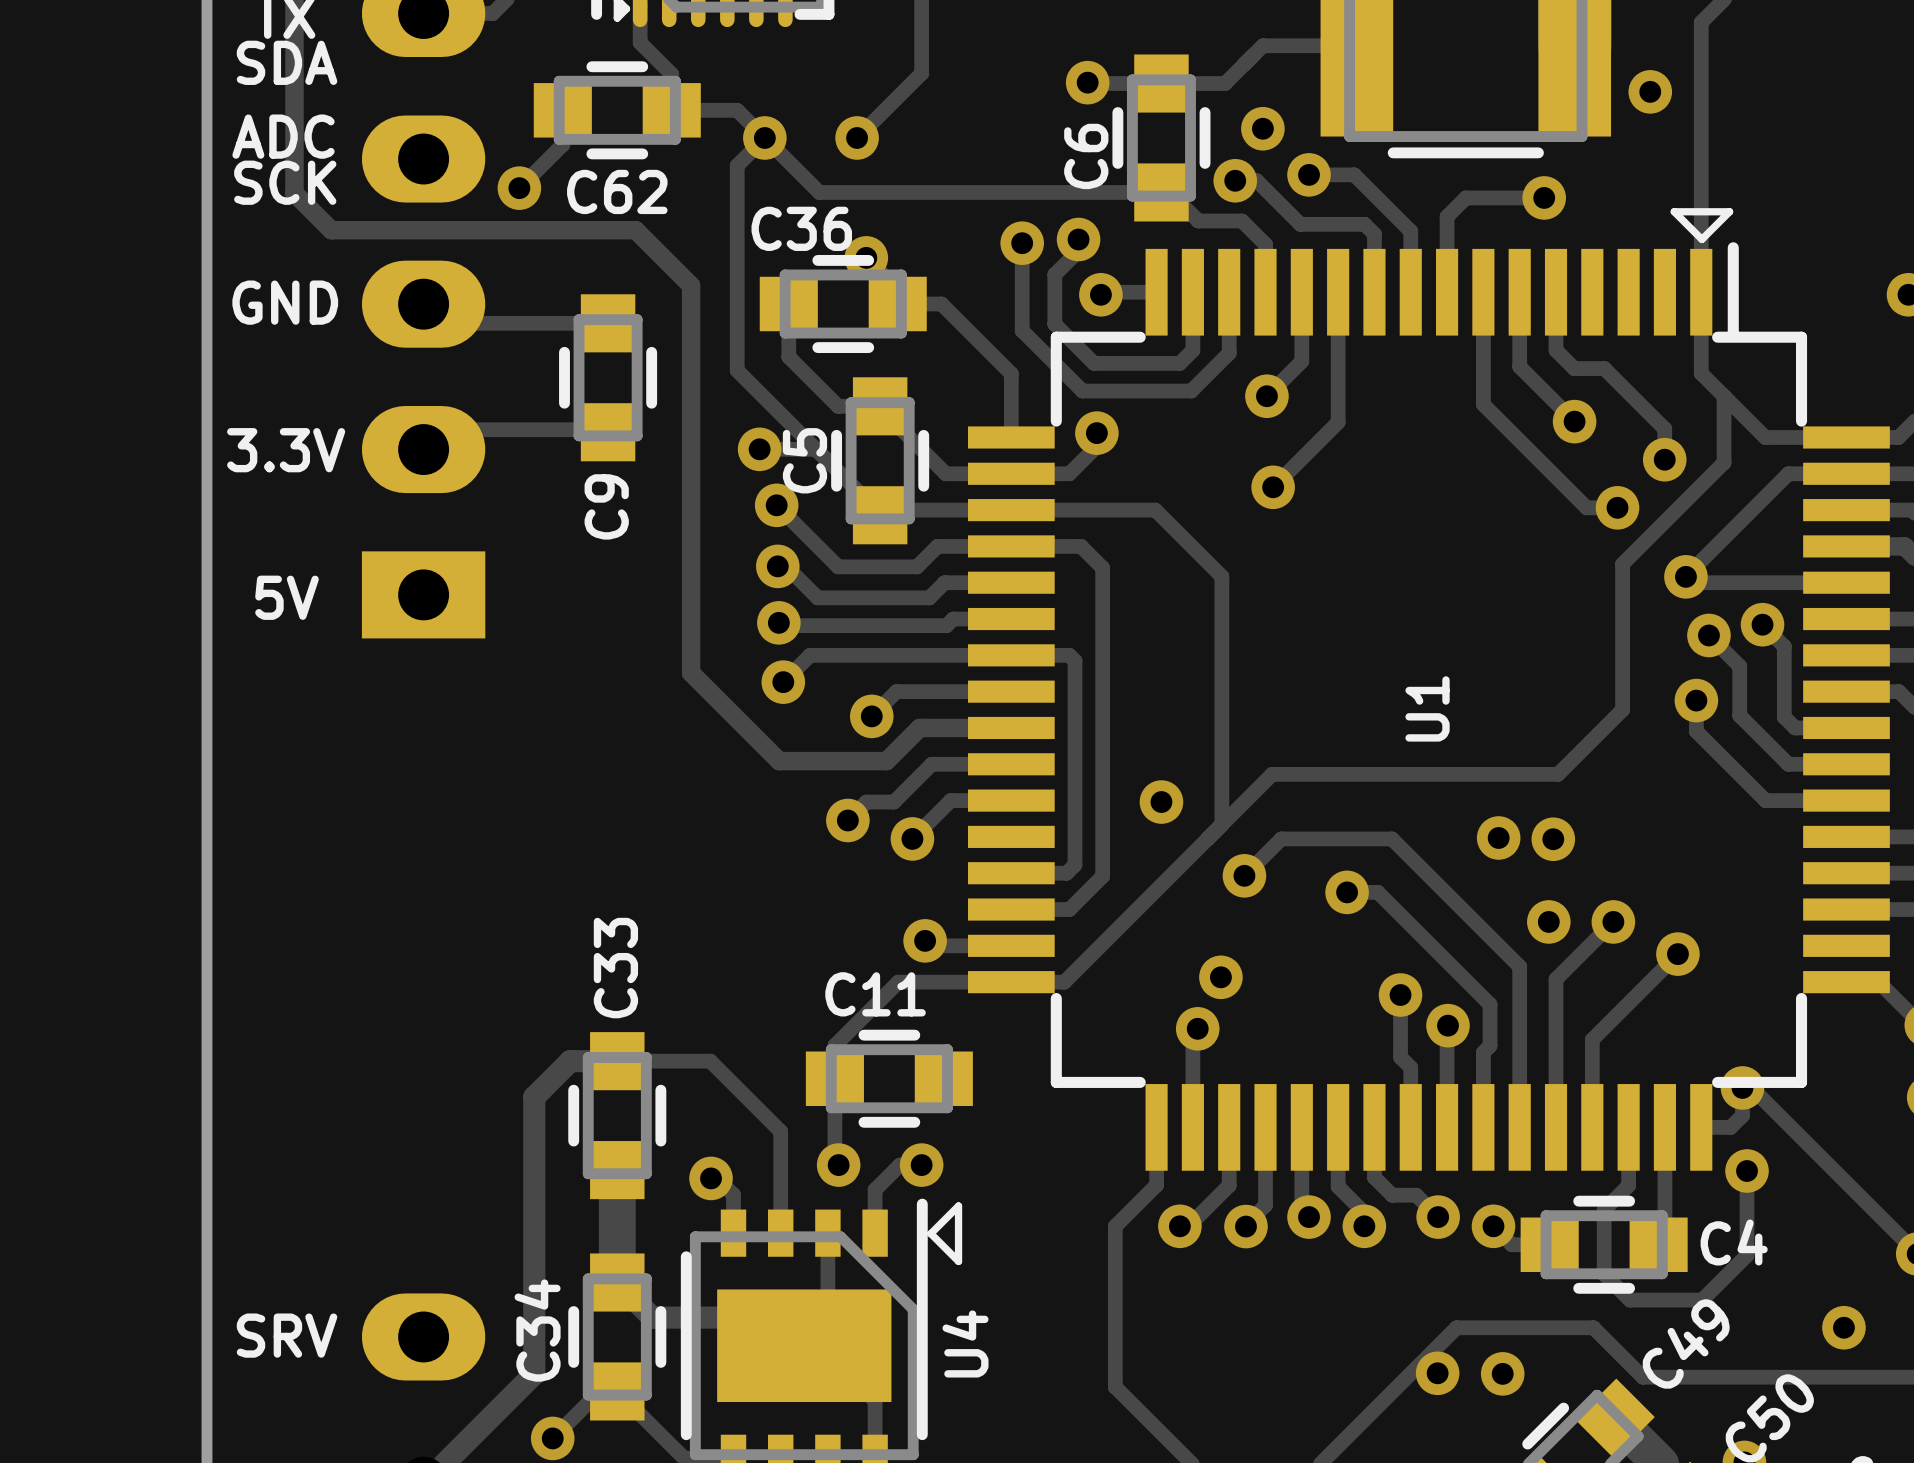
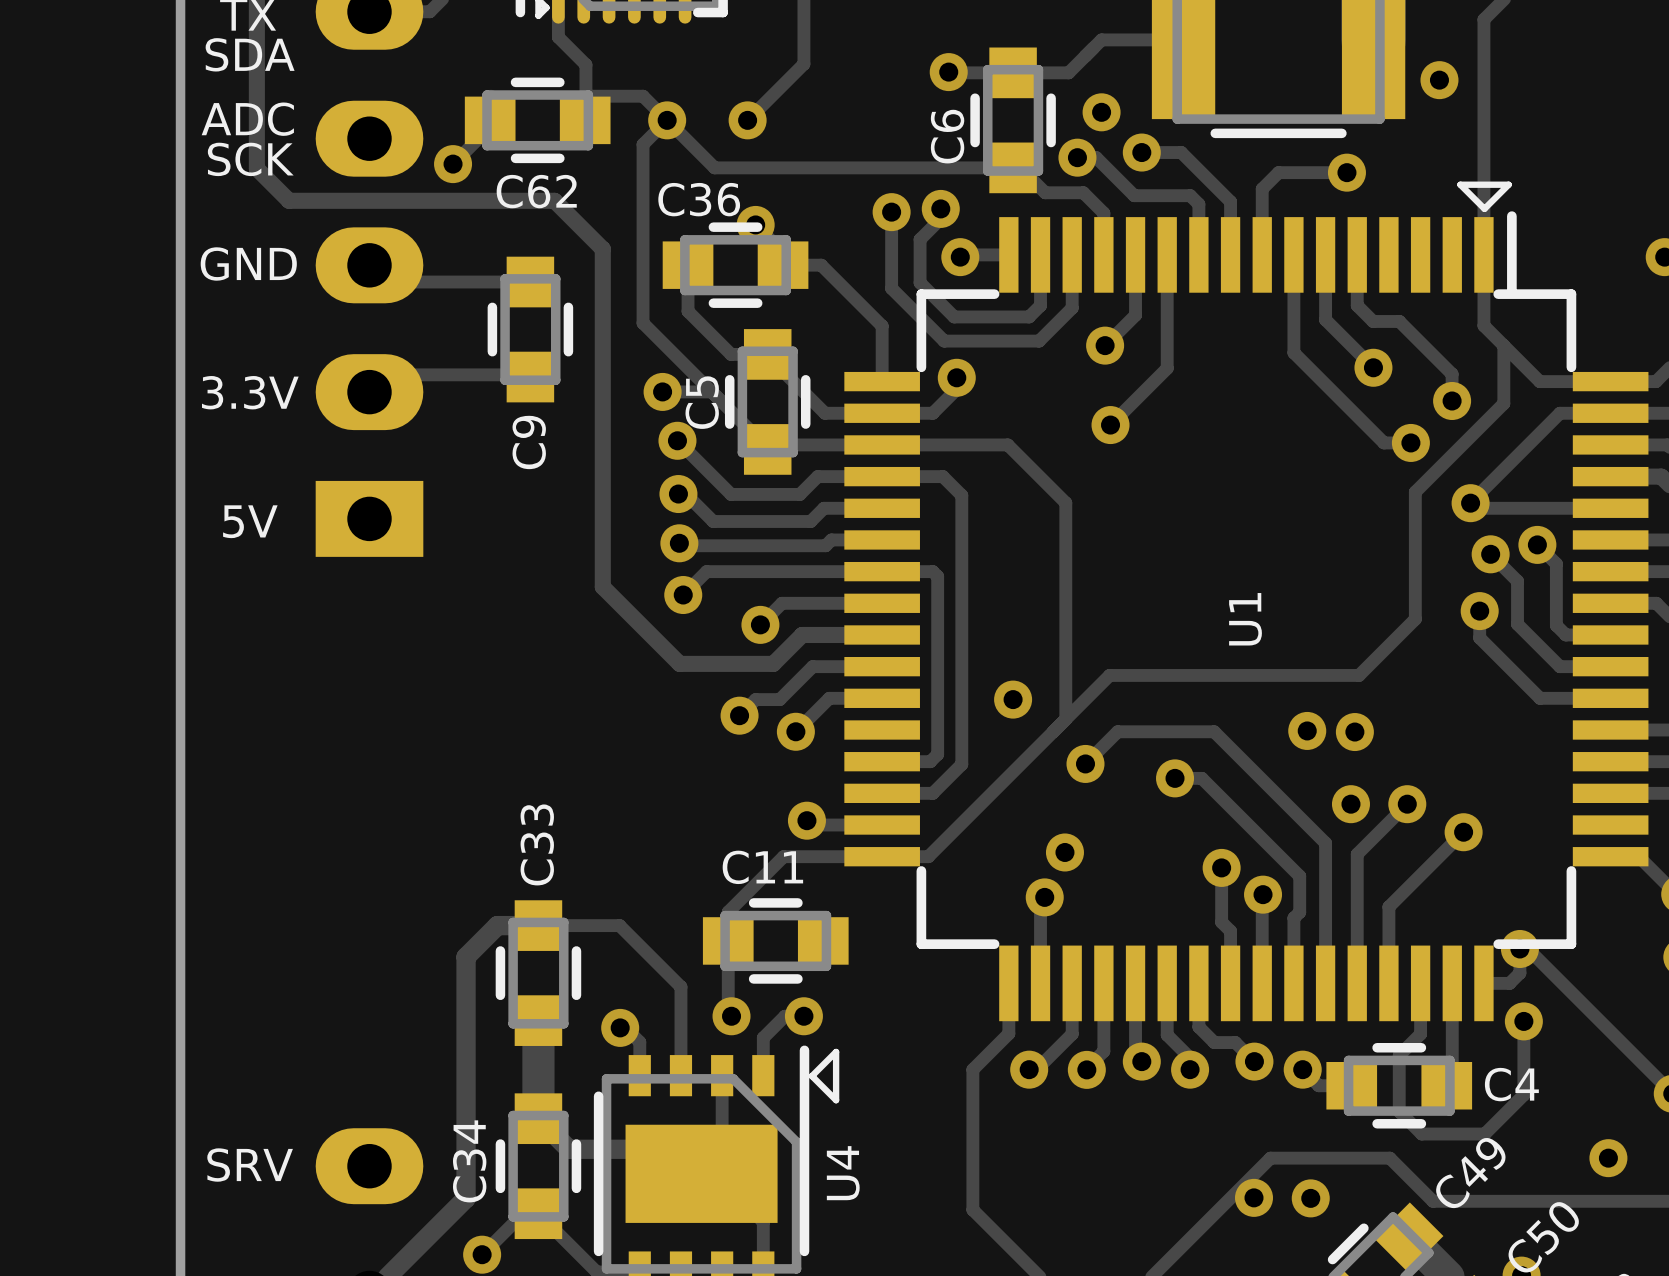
C62 position: (617, 110) -> (537, 120)

